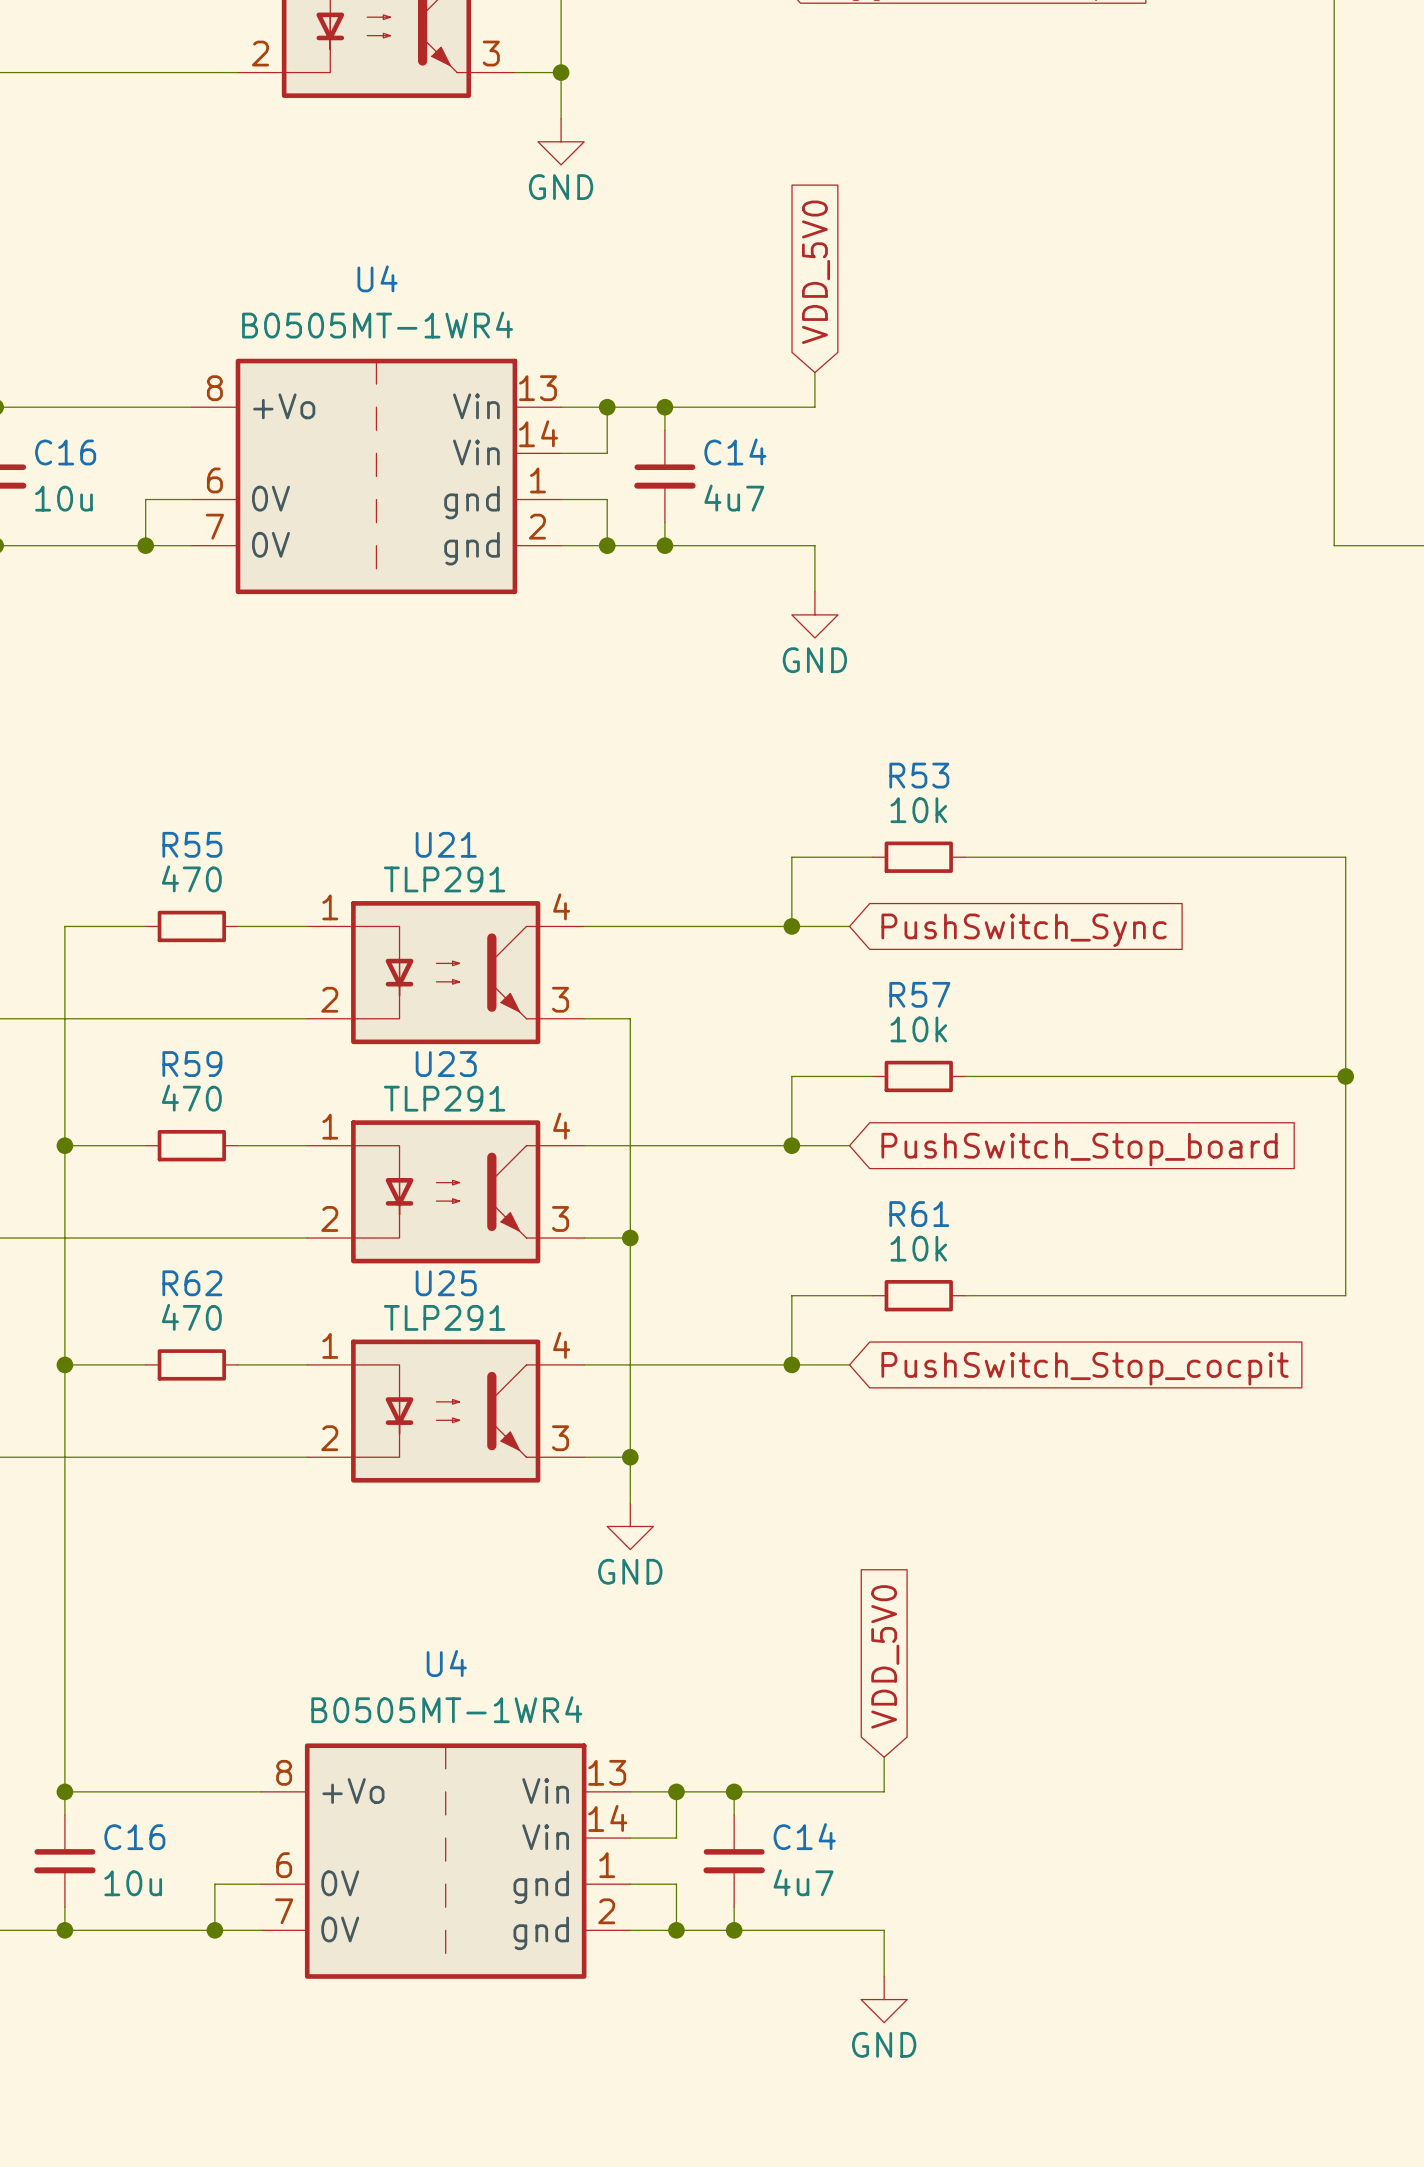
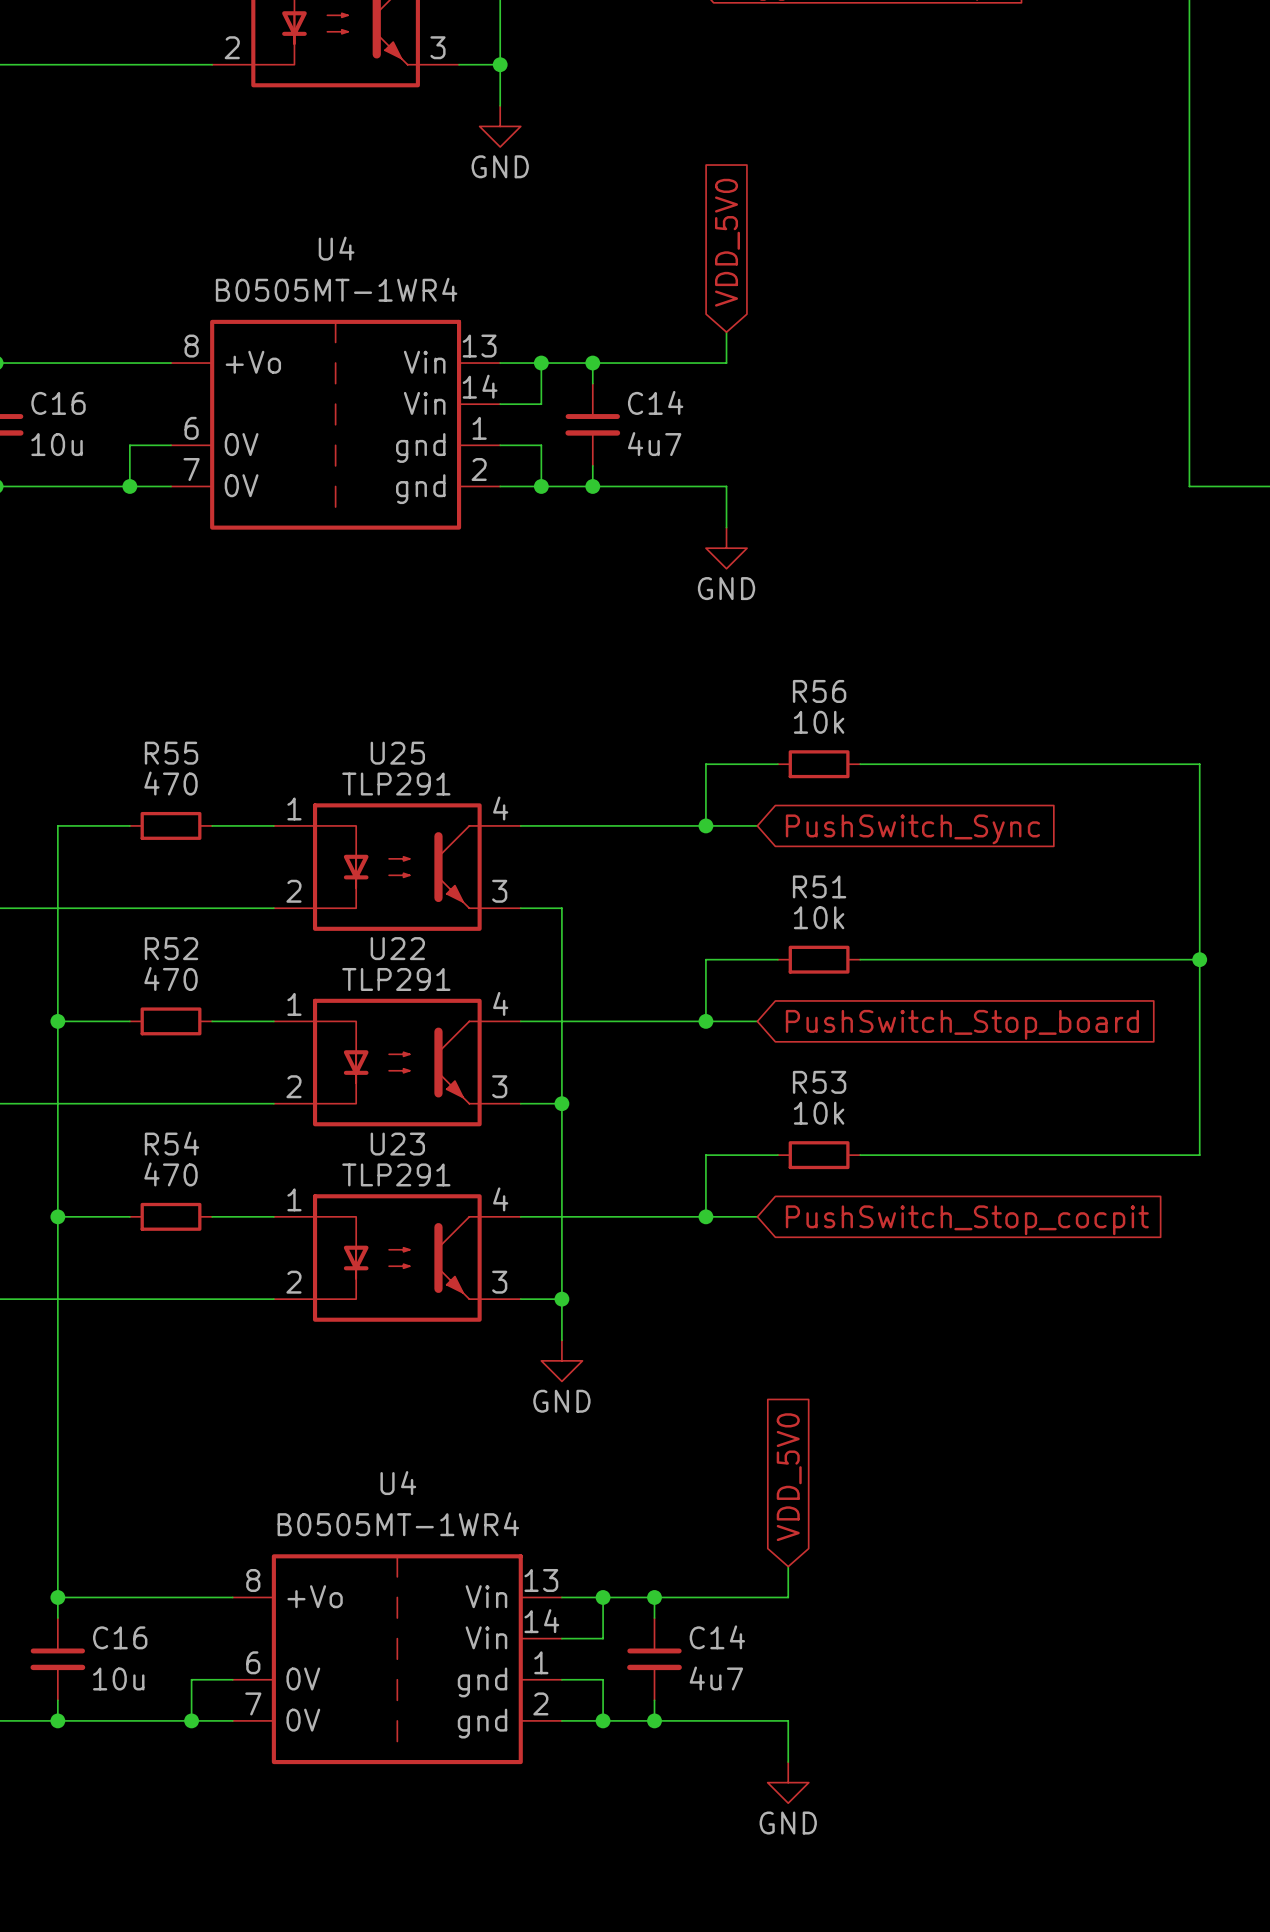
R53 name: R53 (919, 775) -> R56 (819, 691)
U21 name: U21 (446, 844) -> U25 (397, 753)
R57 name: R57 (919, 994) -> R51 (819, 886)
R59 name: R59 (192, 1064) -> R52 (171, 948)
U23 name: U23 (446, 1064) -> U22 (397, 948)
R61 name: R61 (919, 1214) -> R53 (819, 1082)
R62 name: R62 (192, 1283) -> R54 (172, 1143)
U25 name: U25 (446, 1283) -> U23 (397, 1144)

